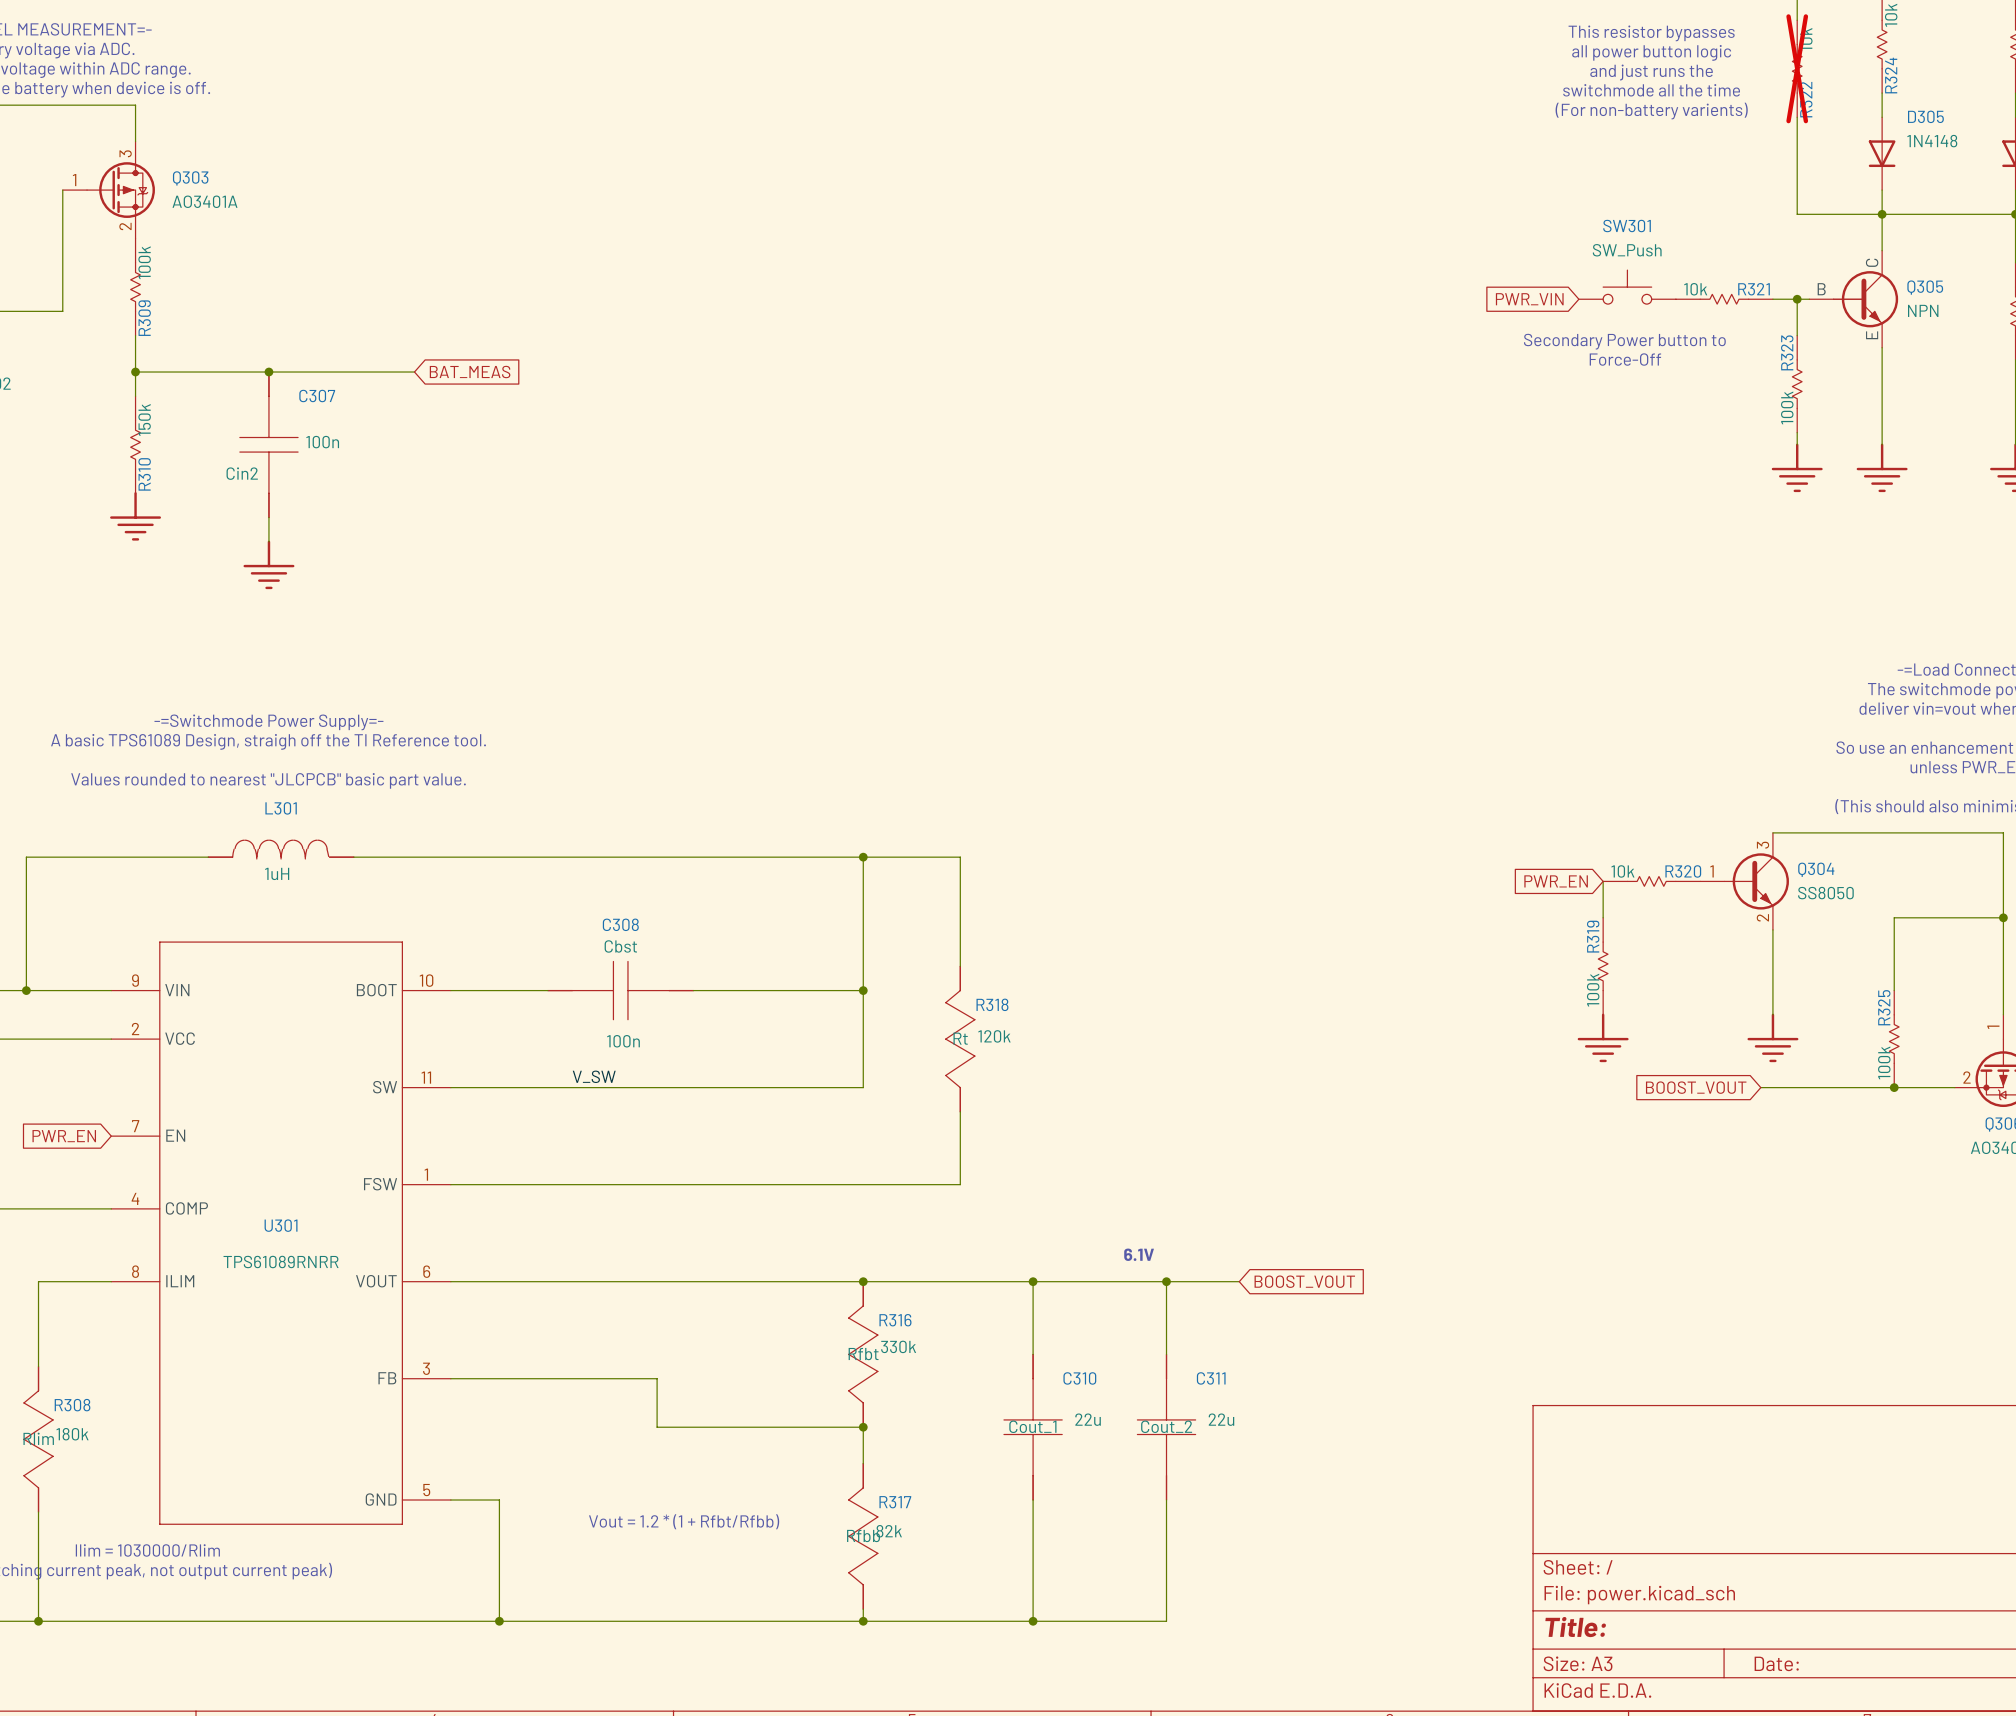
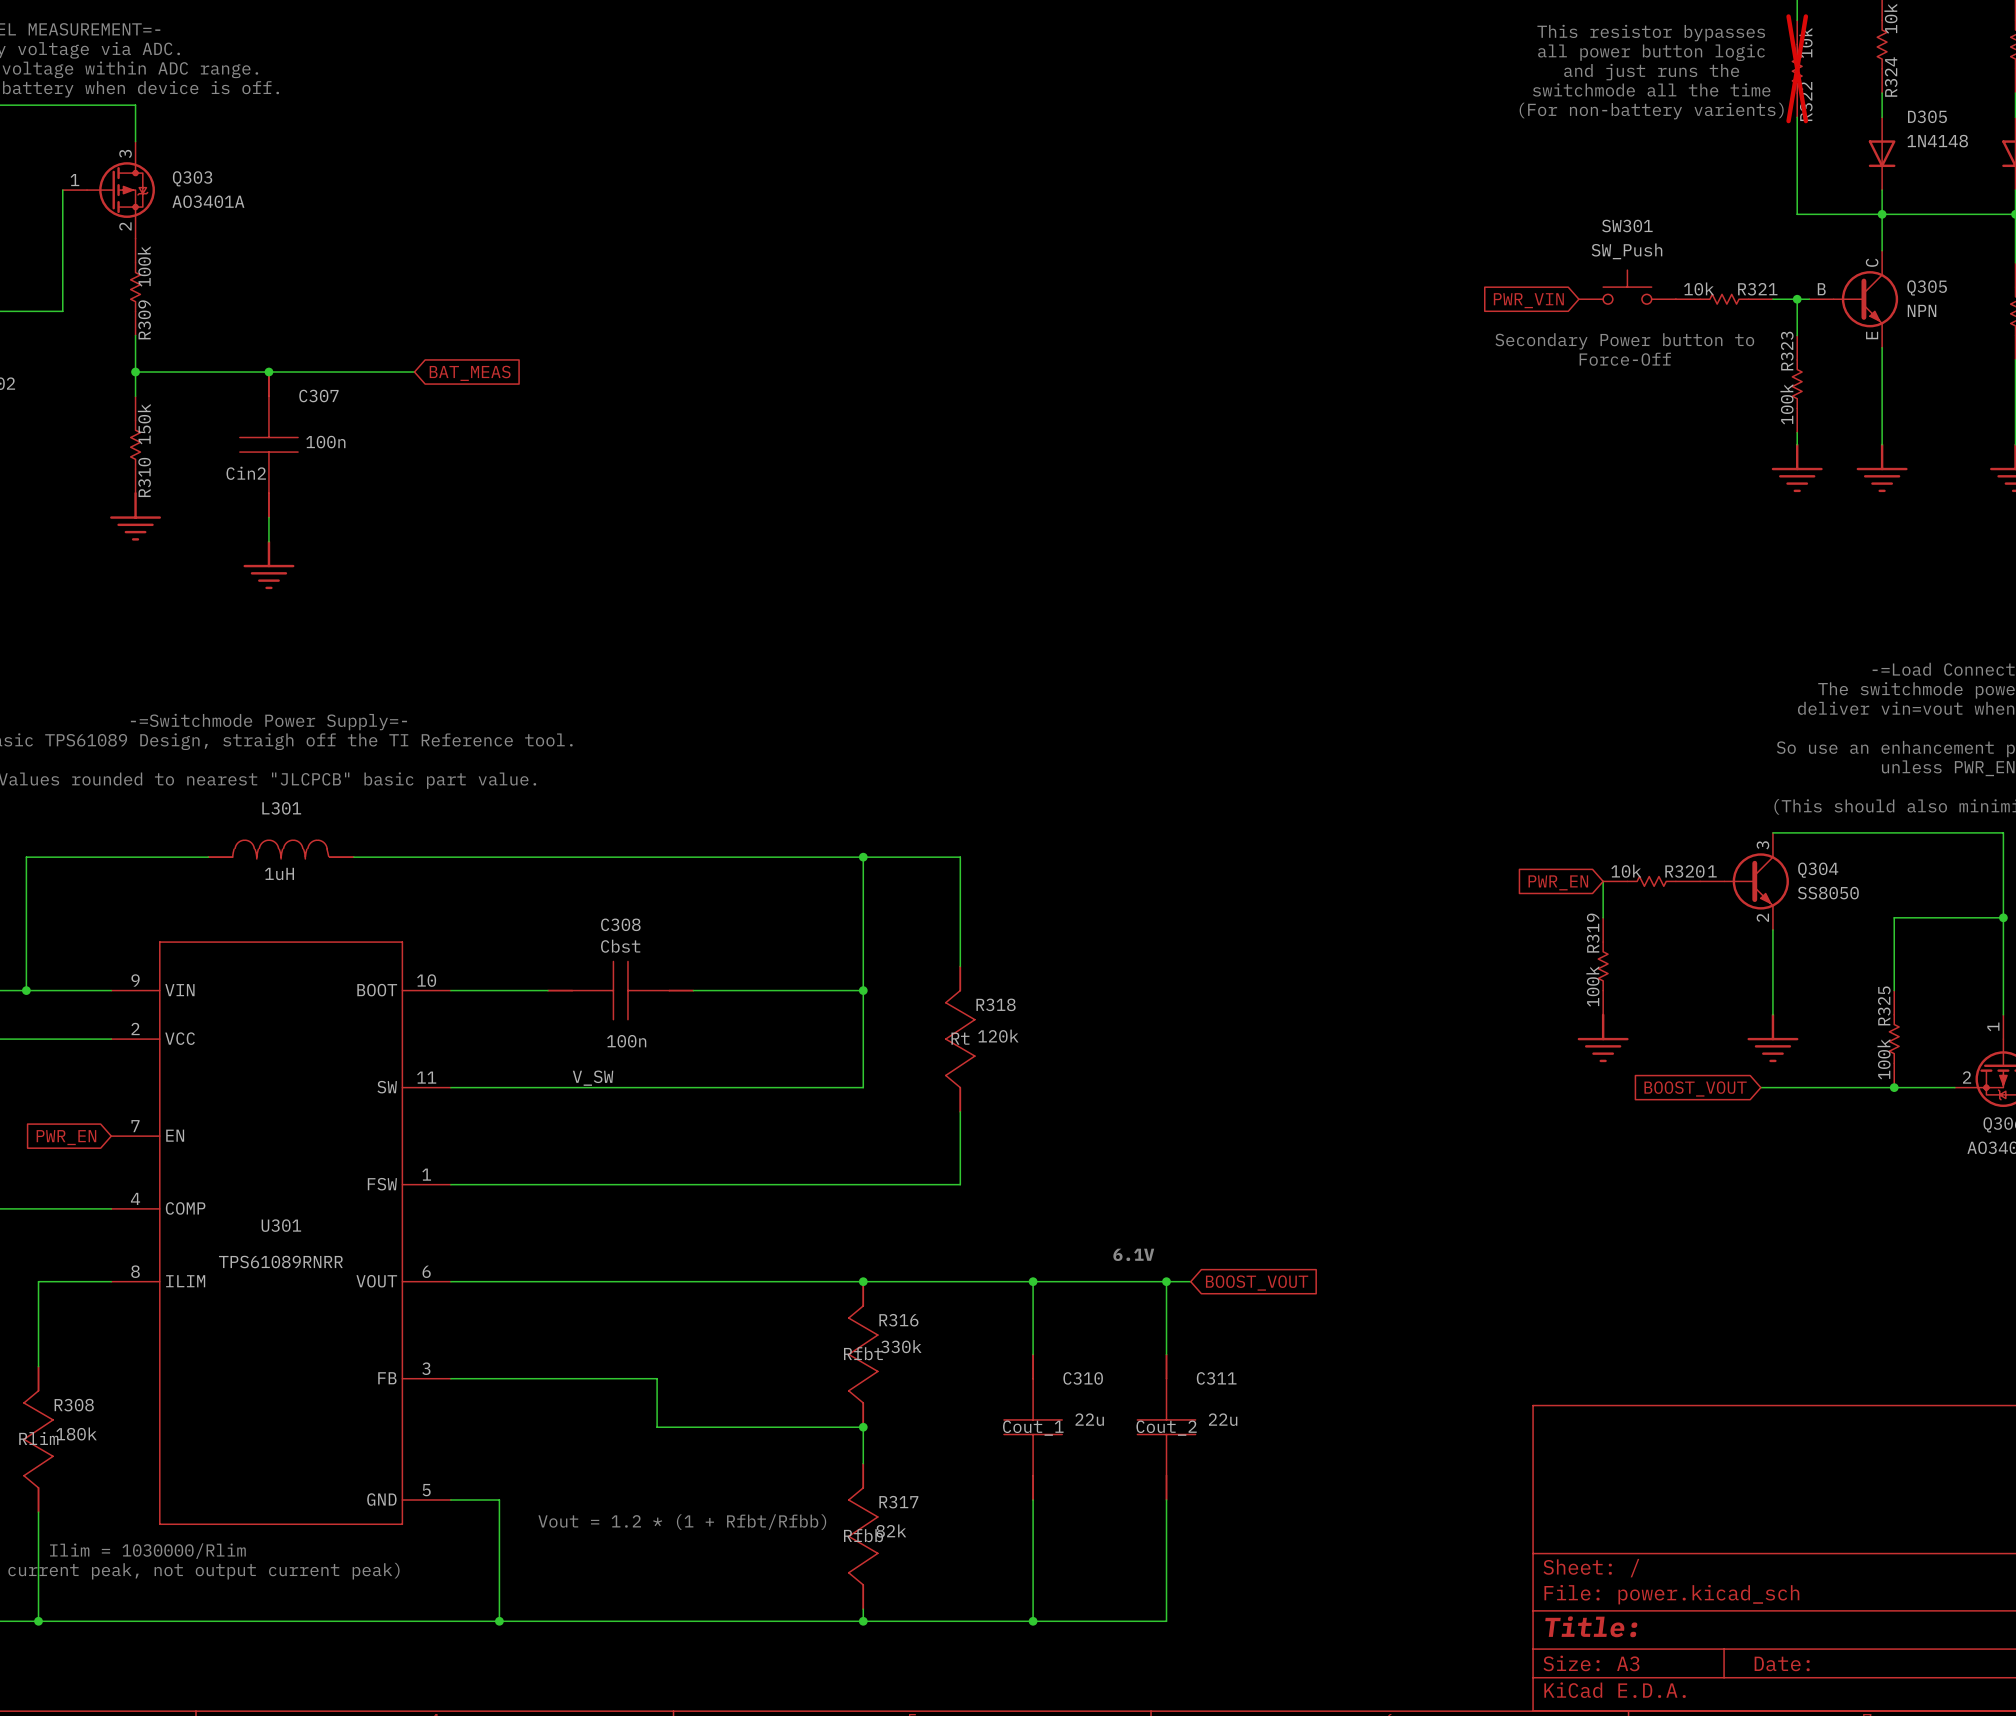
wire: (1190, 1281) (1239, 1281) -> none
global label position: BOOST_VOUT (1304, 1281) -> BOOST_VOUT (1257, 1283)

